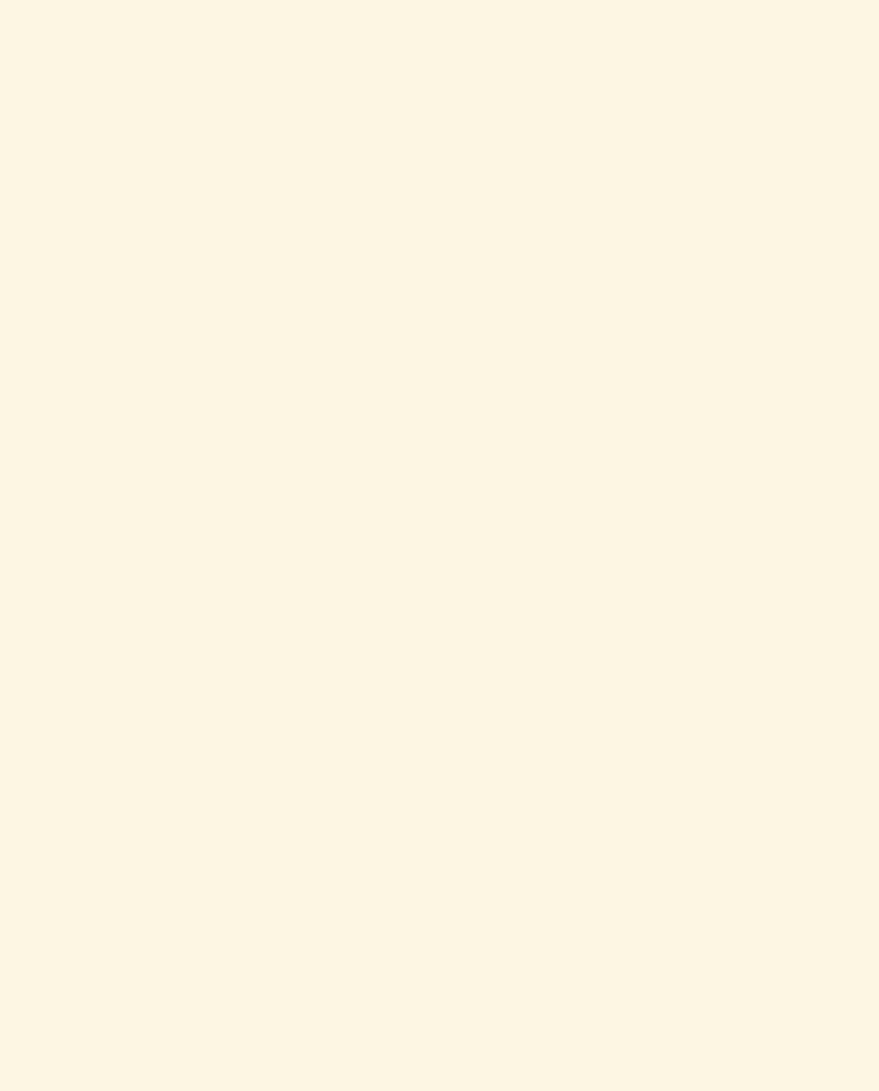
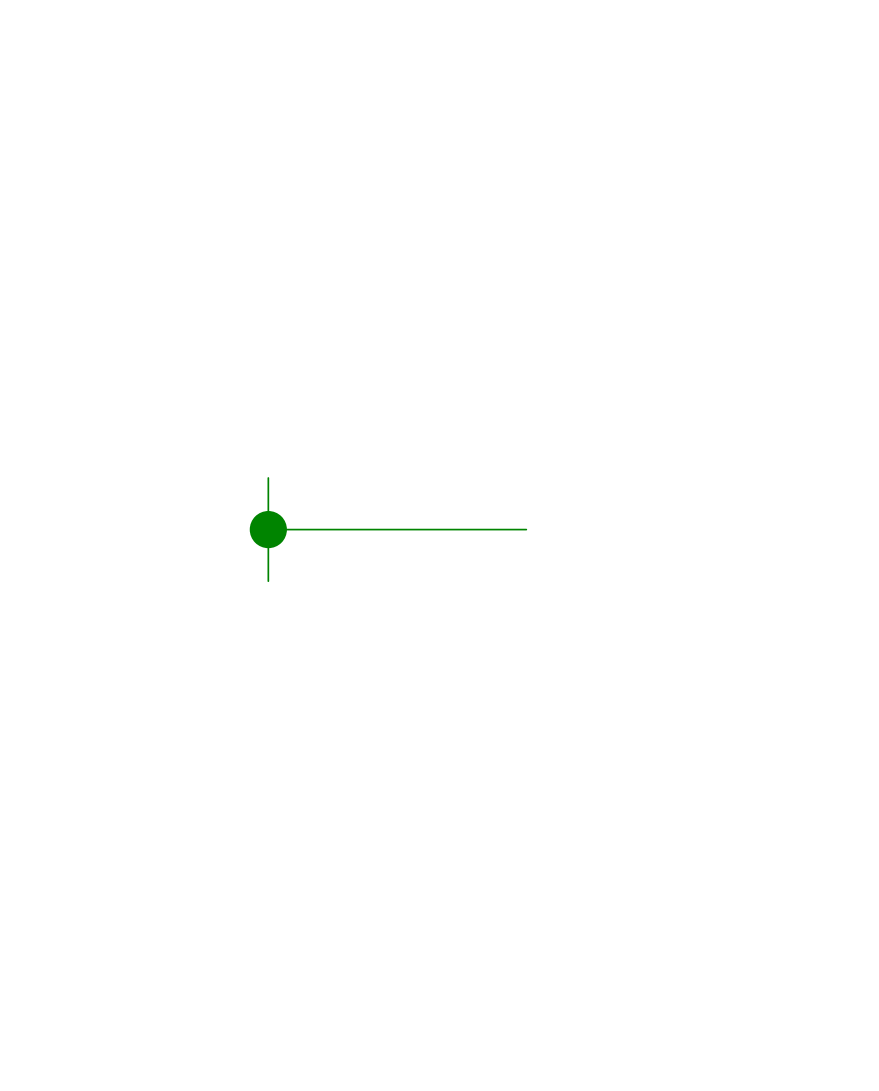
wire: none -> (268, 477) (268, 581)
wire: none -> (268, 529) (526, 529)
junction: none -> (268, 529)

